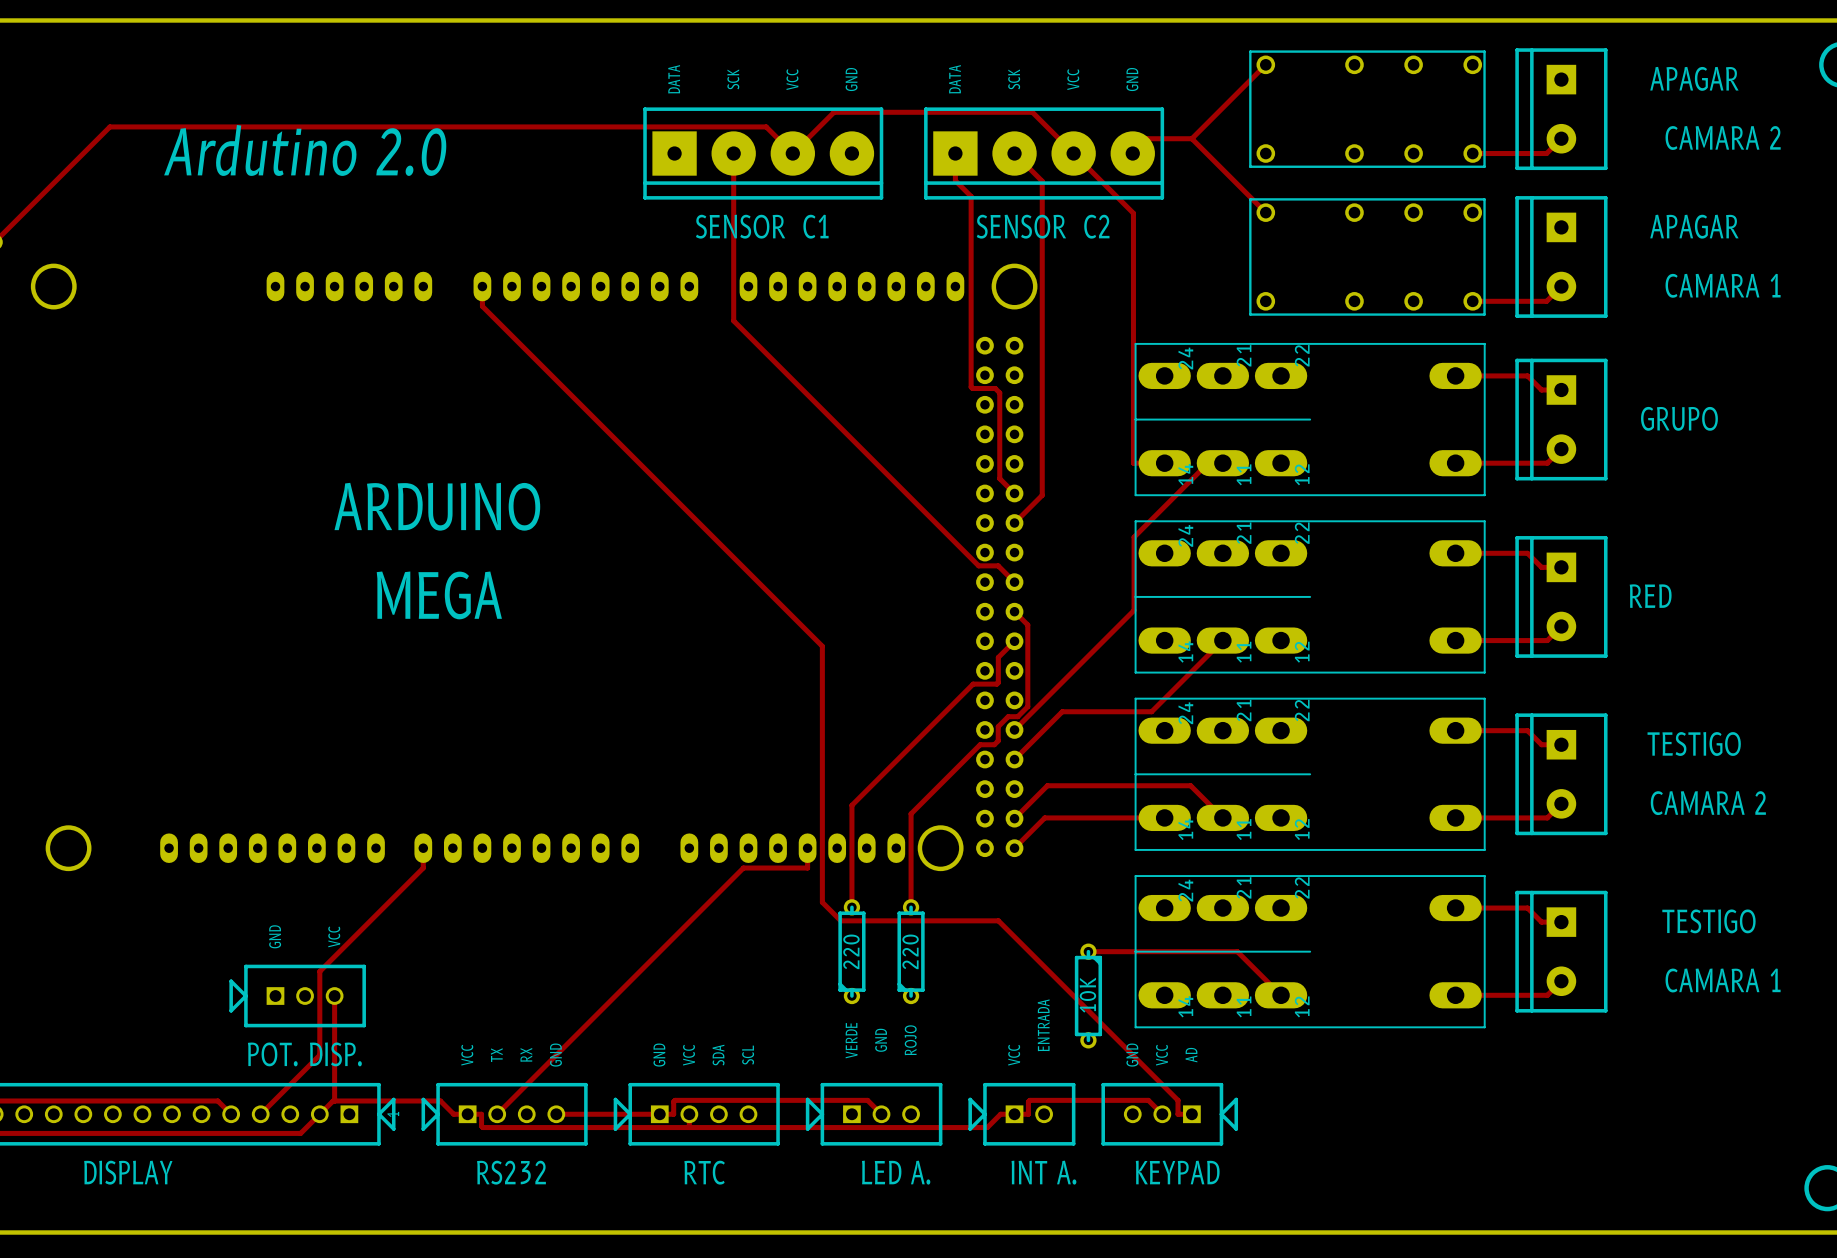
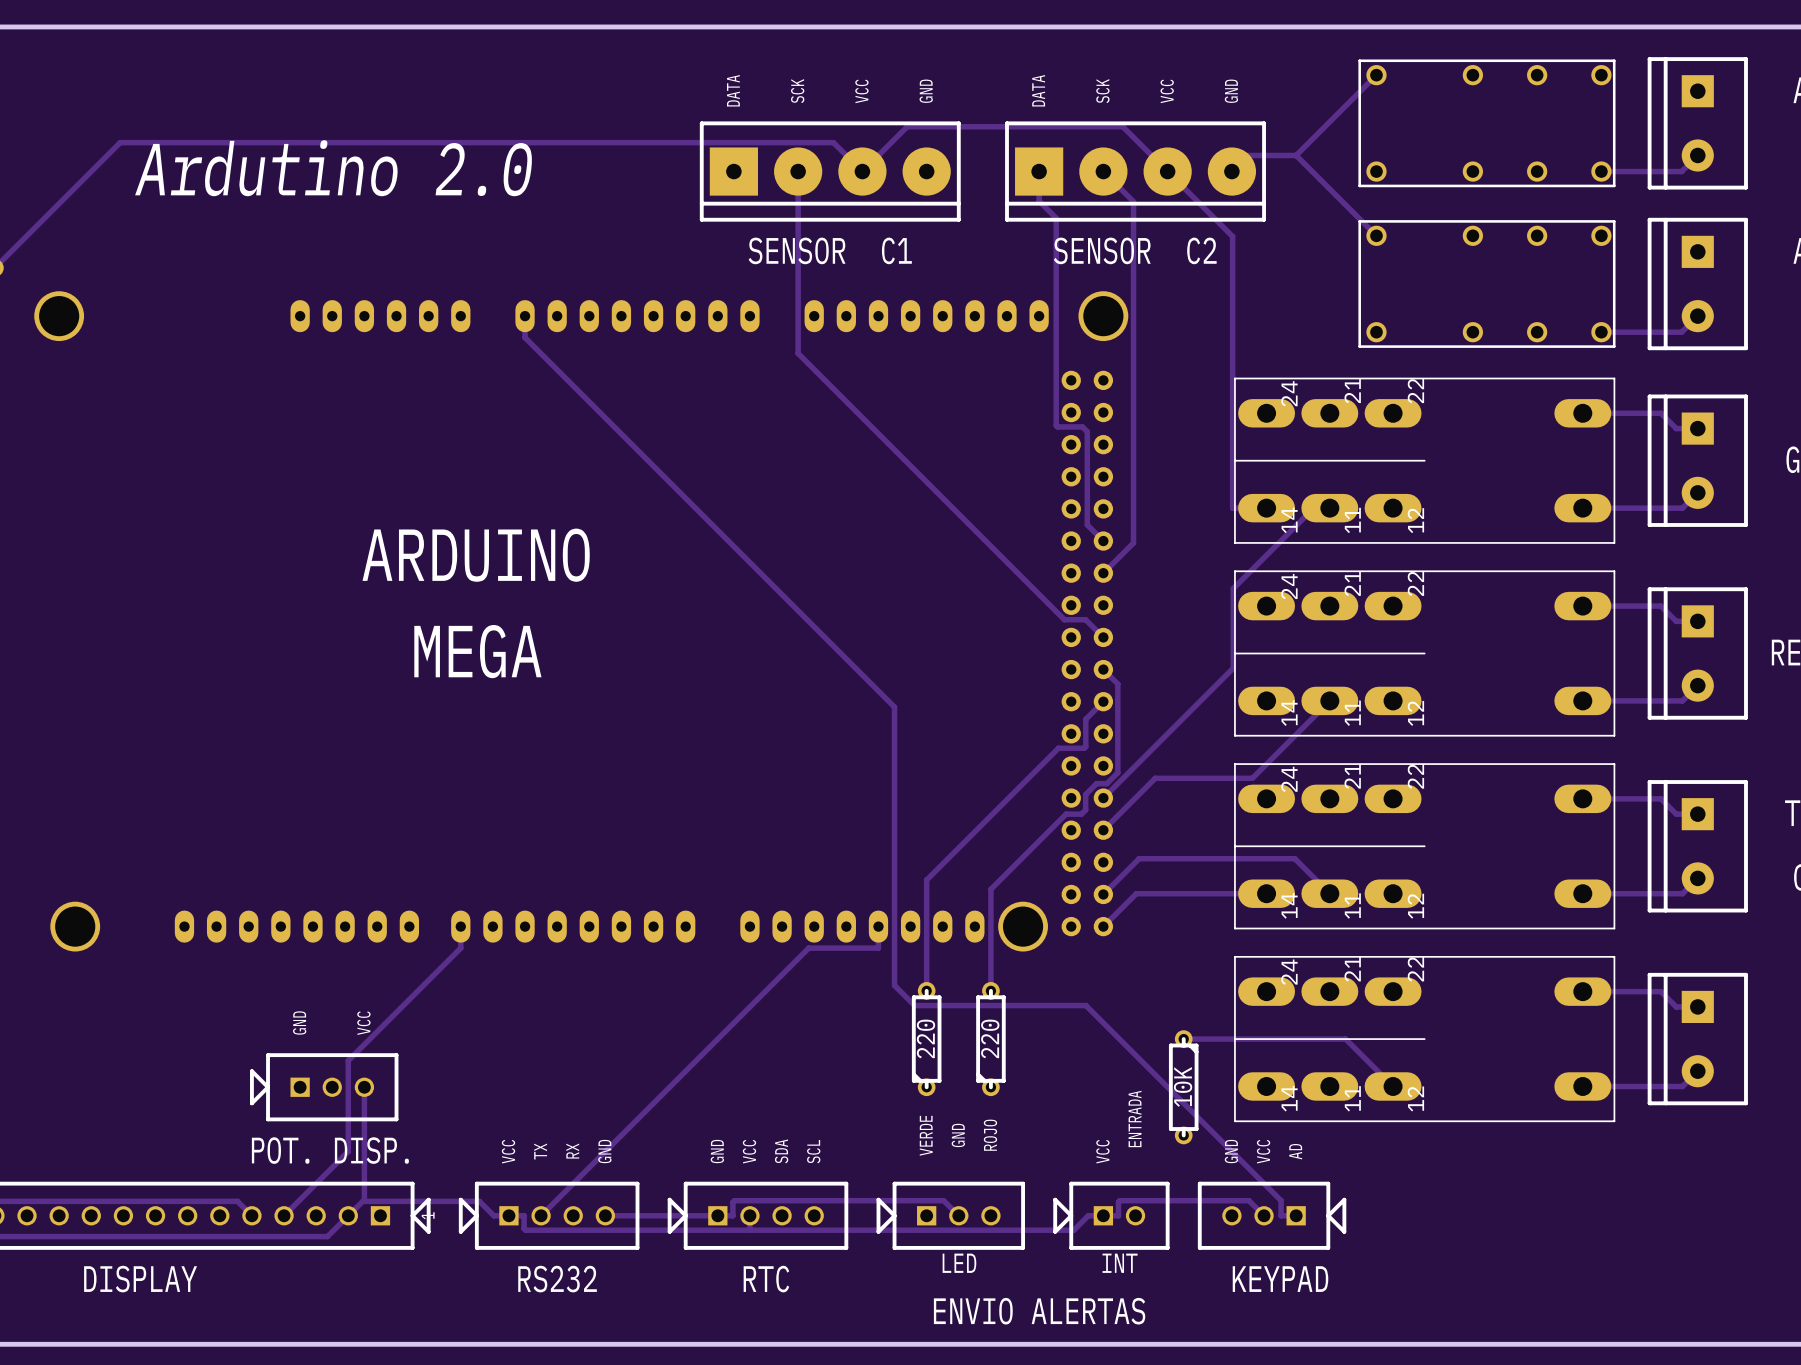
text: LED A. (896, 1172) -> LED (959, 1263)
text: INT A. (1043, 1172) -> INT (1120, 1263)
text: none -> ENVIO ALERTAS (1039, 1311)

